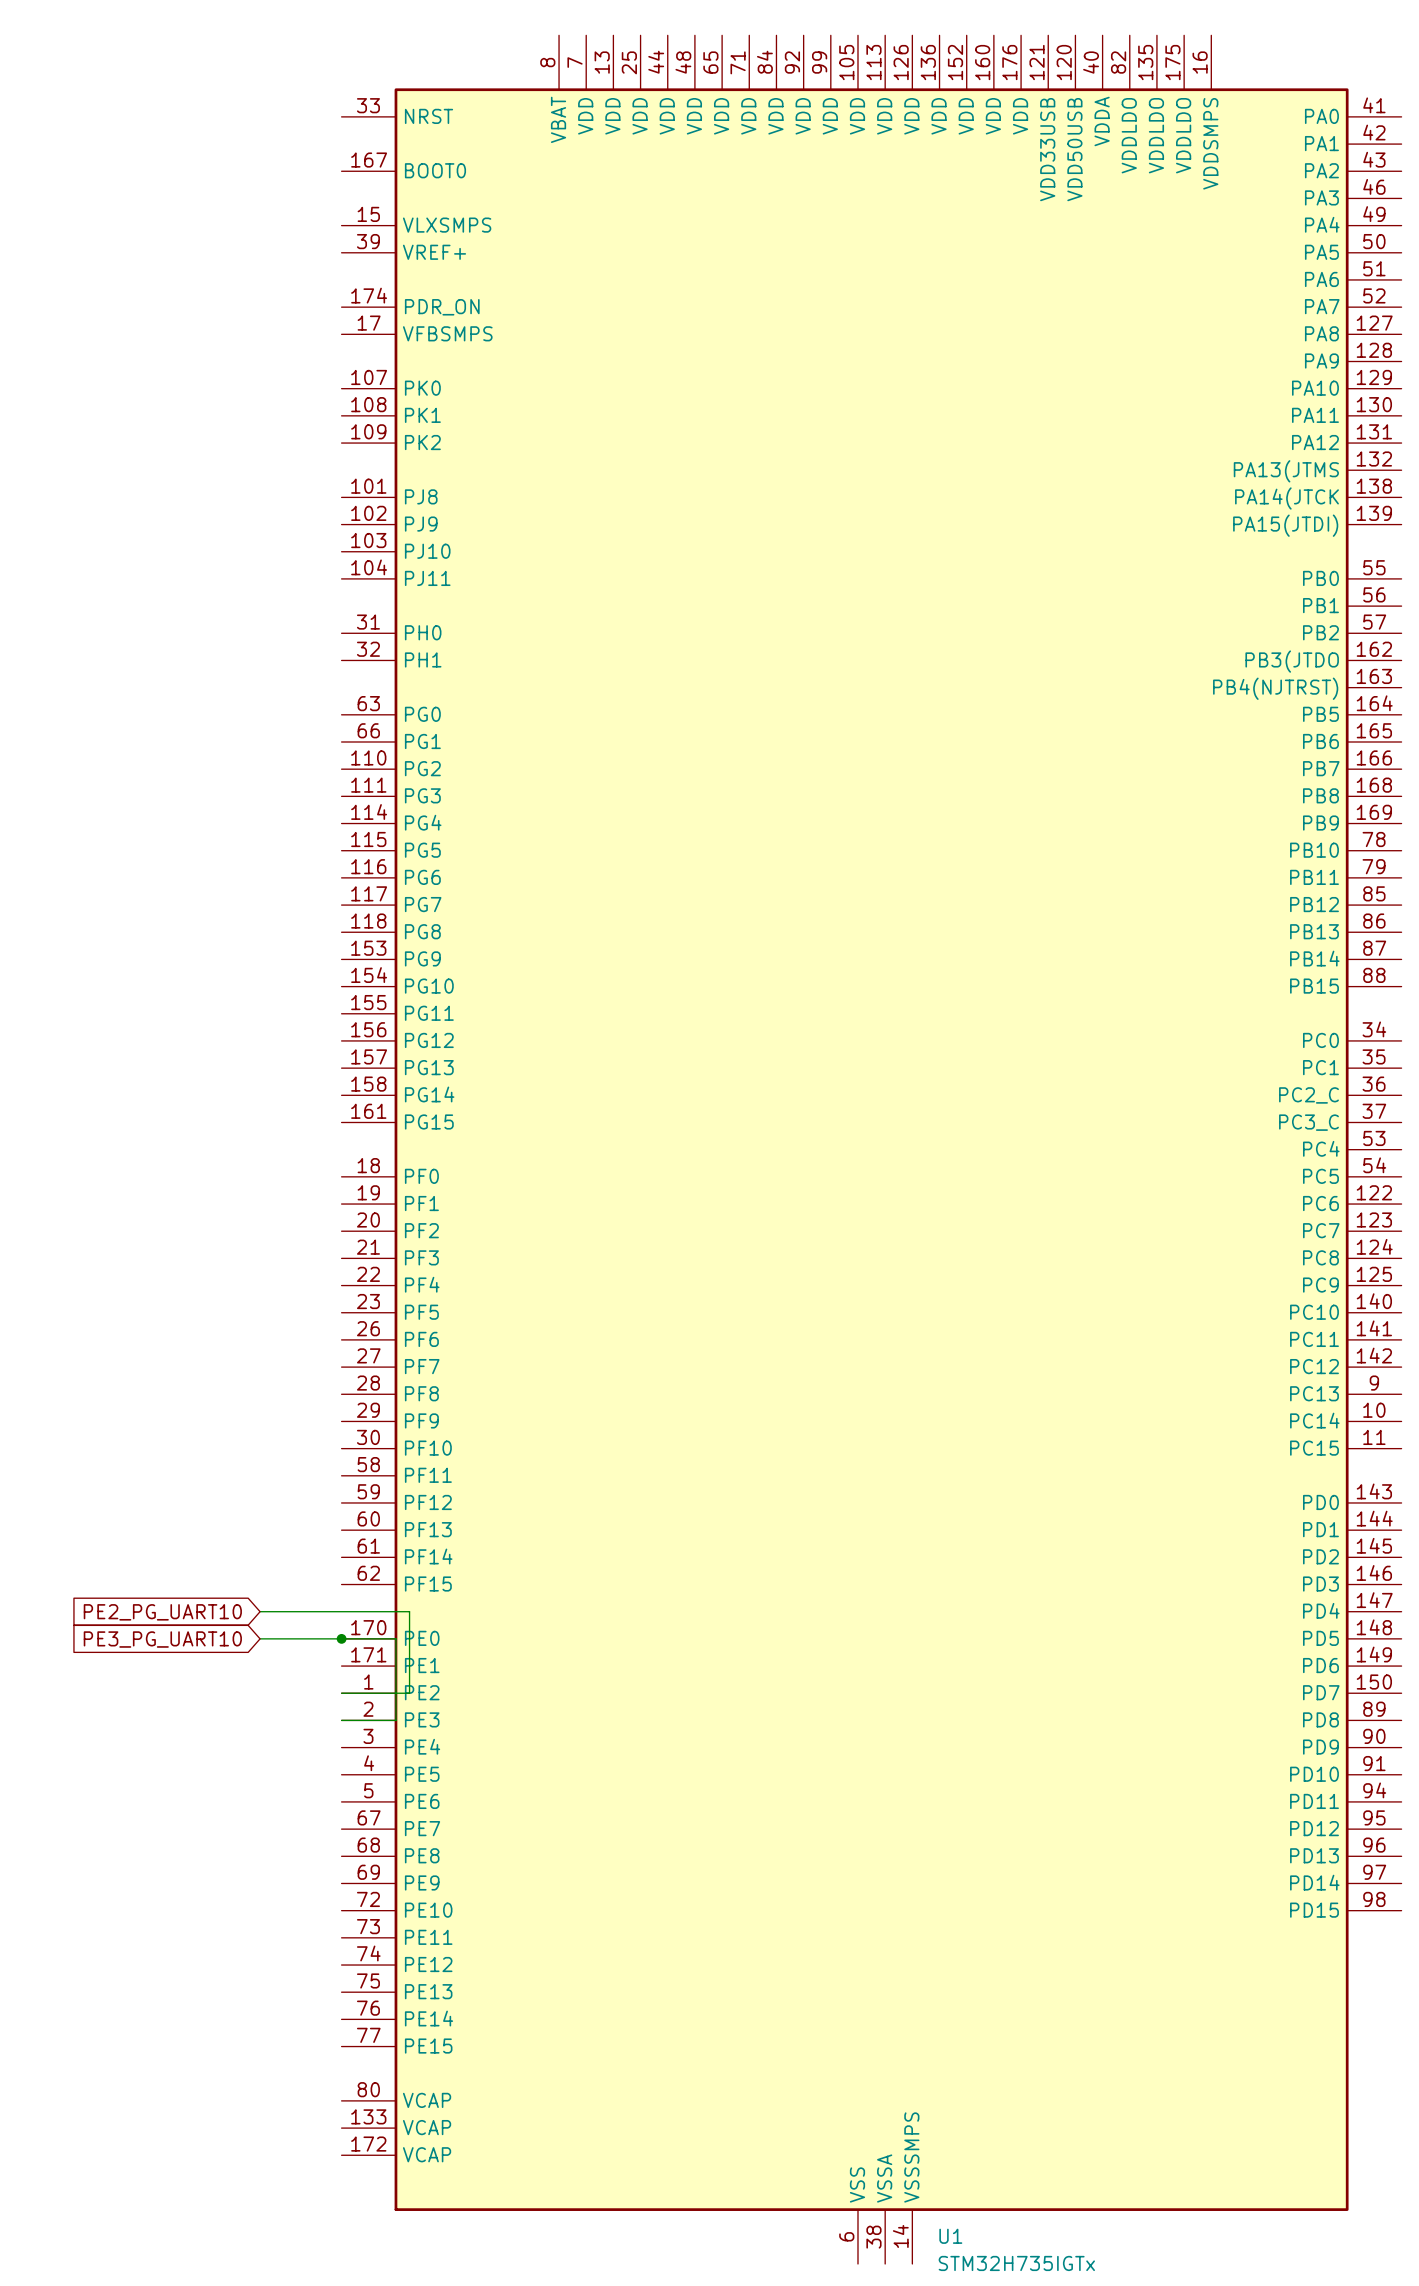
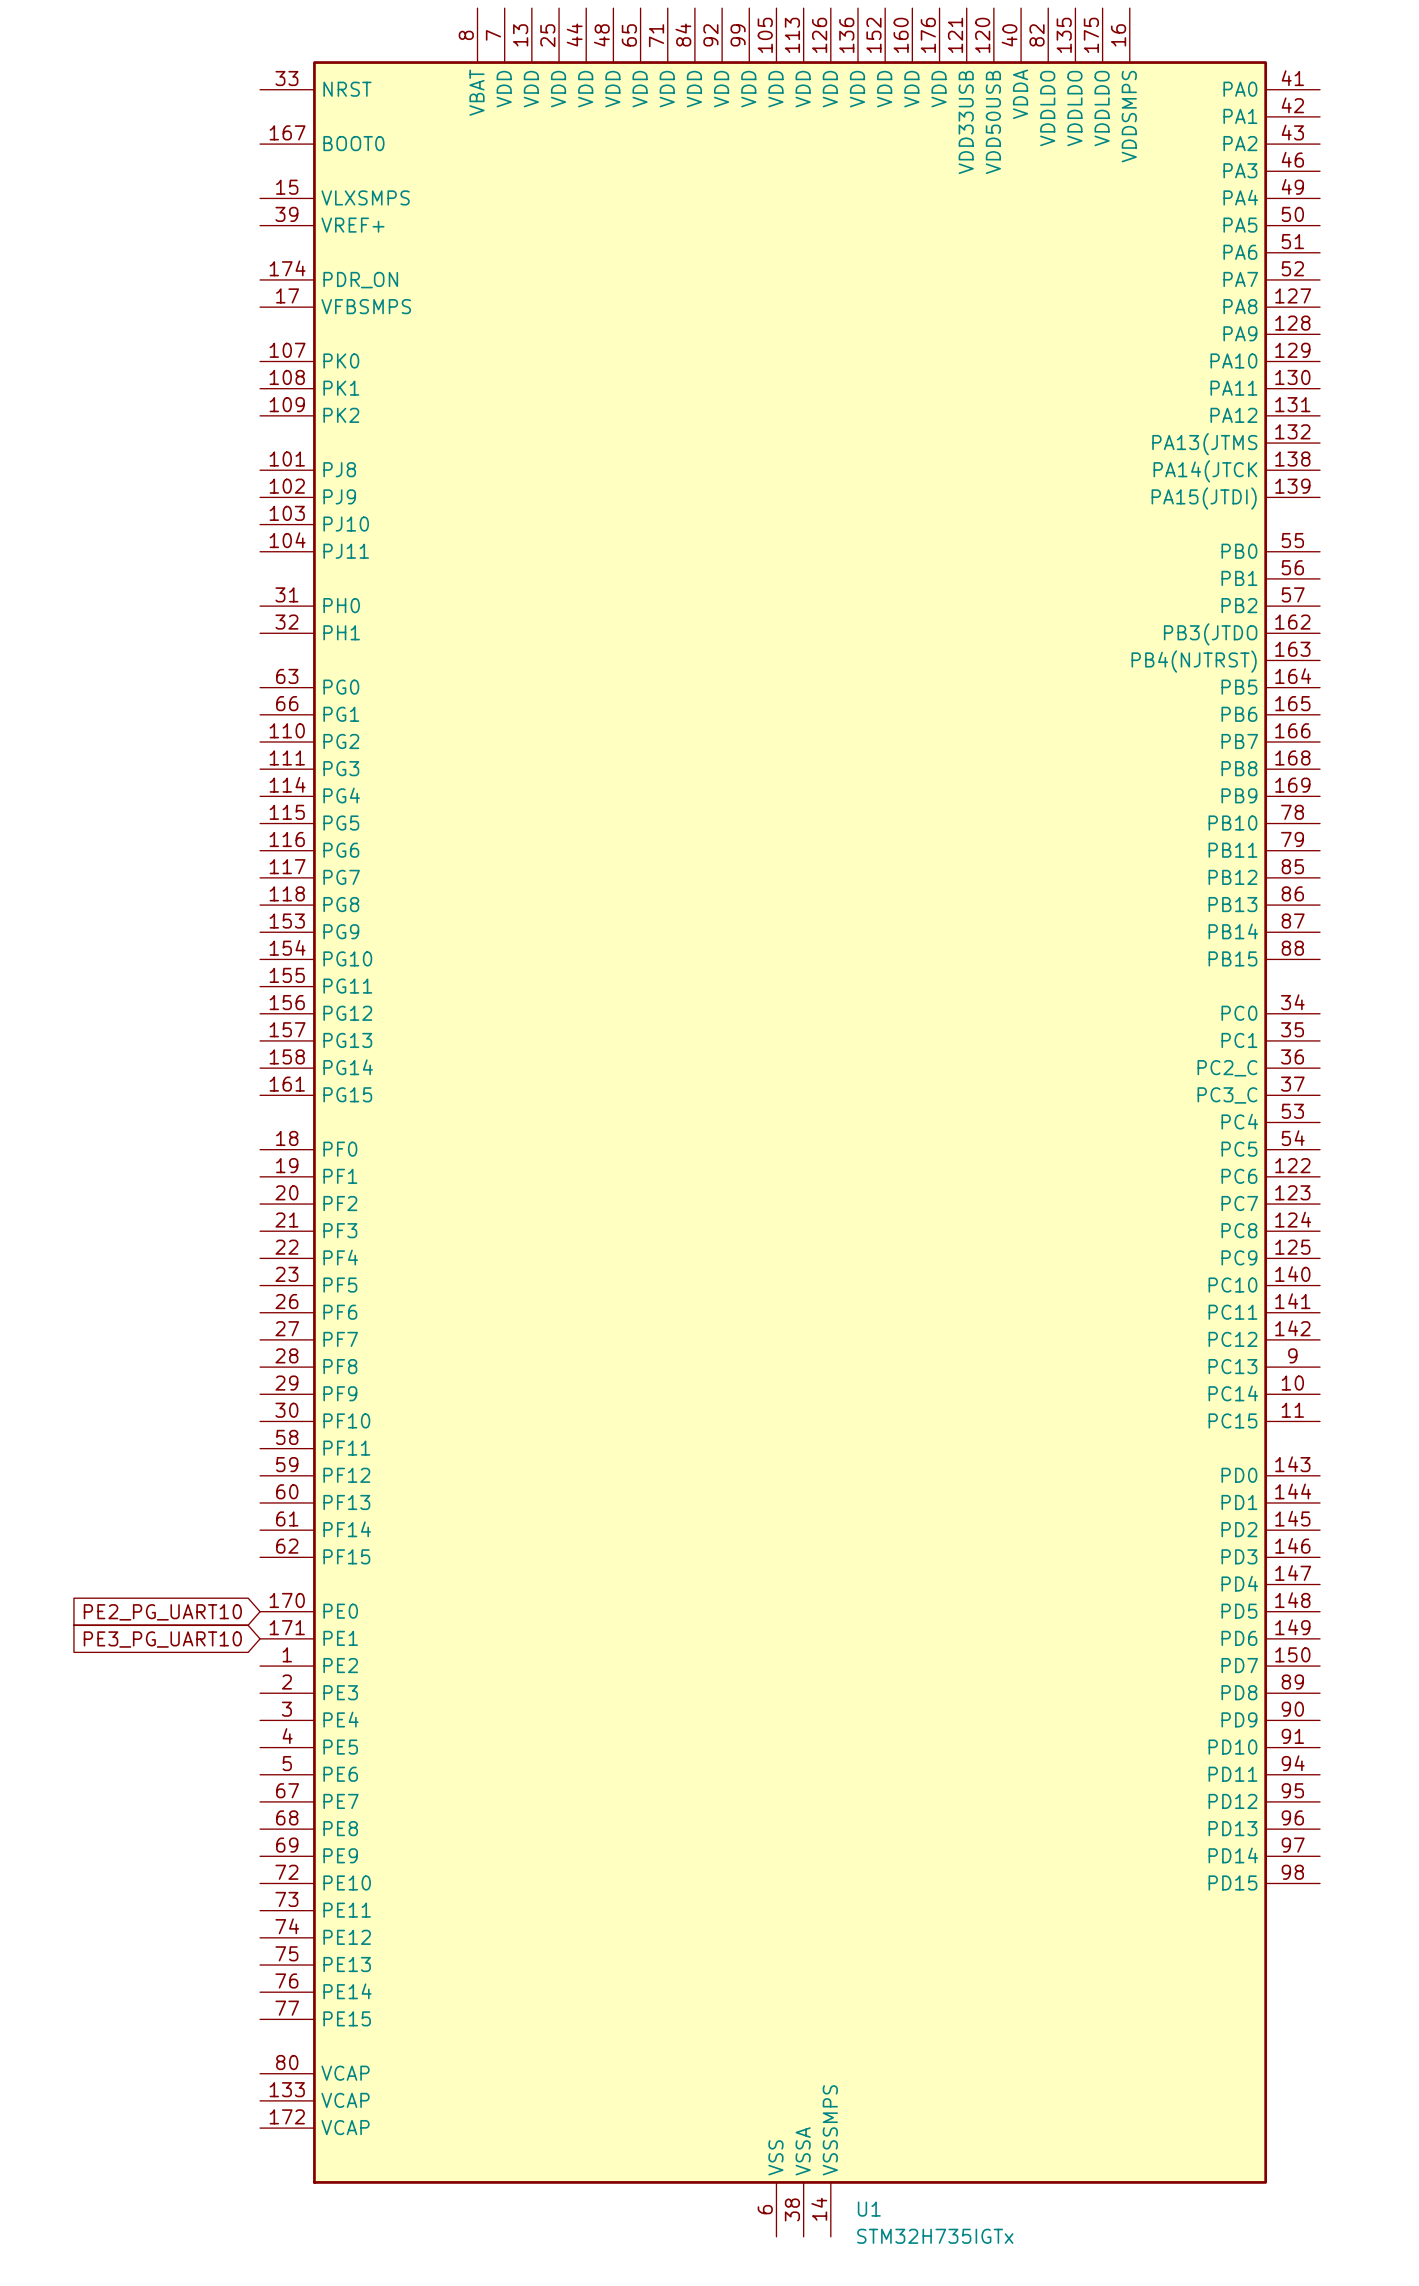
U1 position: (871, 1149) -> (790, 1122)
junction: (341, 1638) -> none

